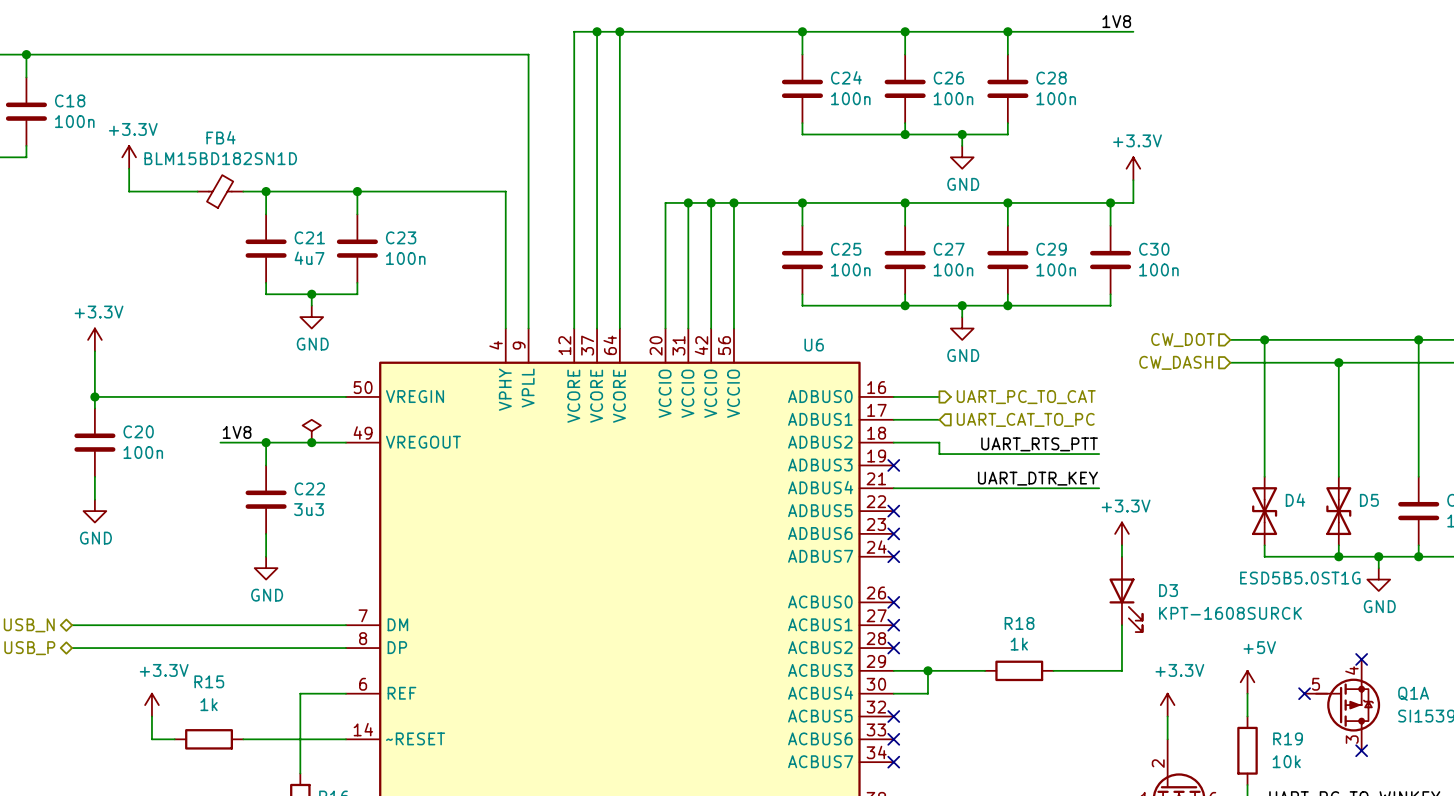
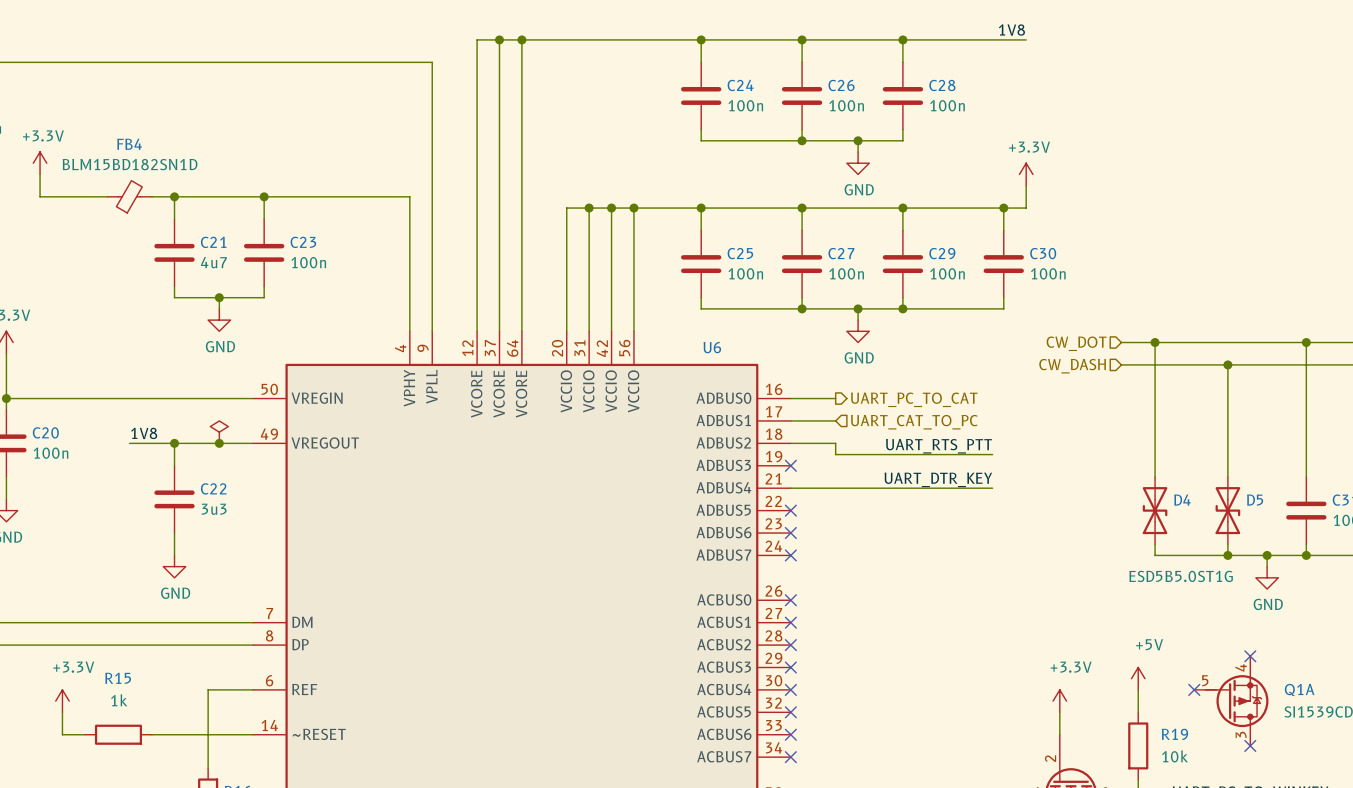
power symbol: +3.3V (1121, 533) -> none
wire: (1121, 545) (1121, 556) -> none
D3: KPT-1608SURCK (1125, 594) -> none
wire: (1121, 625) (1121, 670) (1053, 670) -> none
wire: (893, 670) (985, 670) -> none
no-connect mark: none -> (790, 667)
wire: (927, 670) (927, 693) (893, 693) -> none
junction: (927, 670) -> none
R18: 1k (1019, 670) -> none
no-connect mark: none -> (790, 689)

